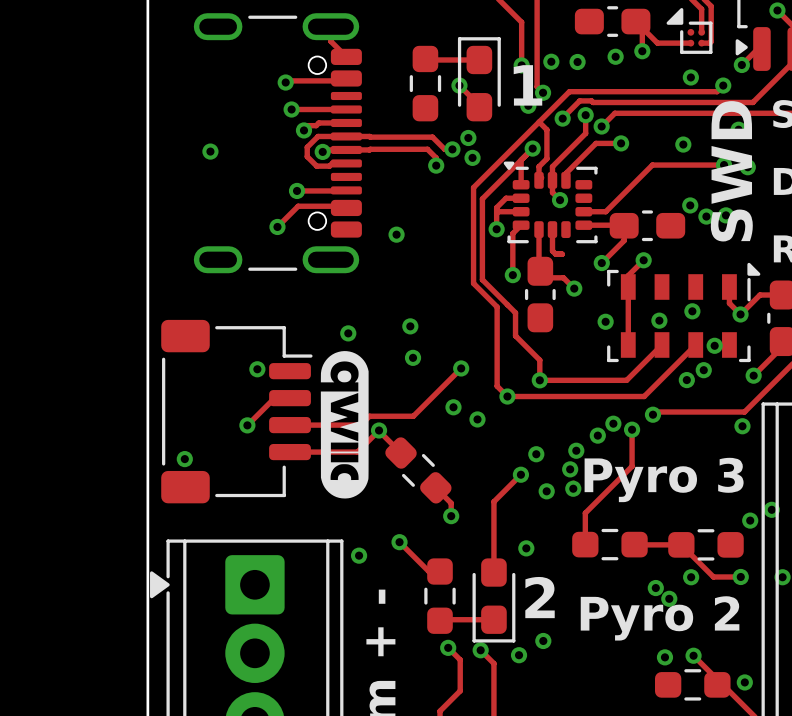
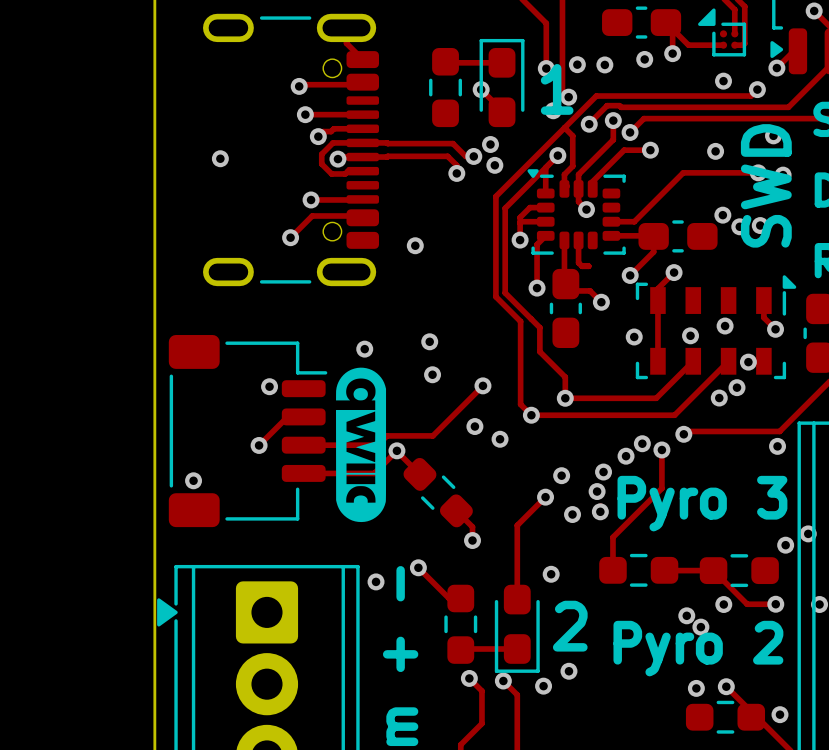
track: (782, 295) (760, 295) (740, 314) -> none
track: (782, 341) (782, 346) (753, 375) -> none
via: (753, 375) -> none

